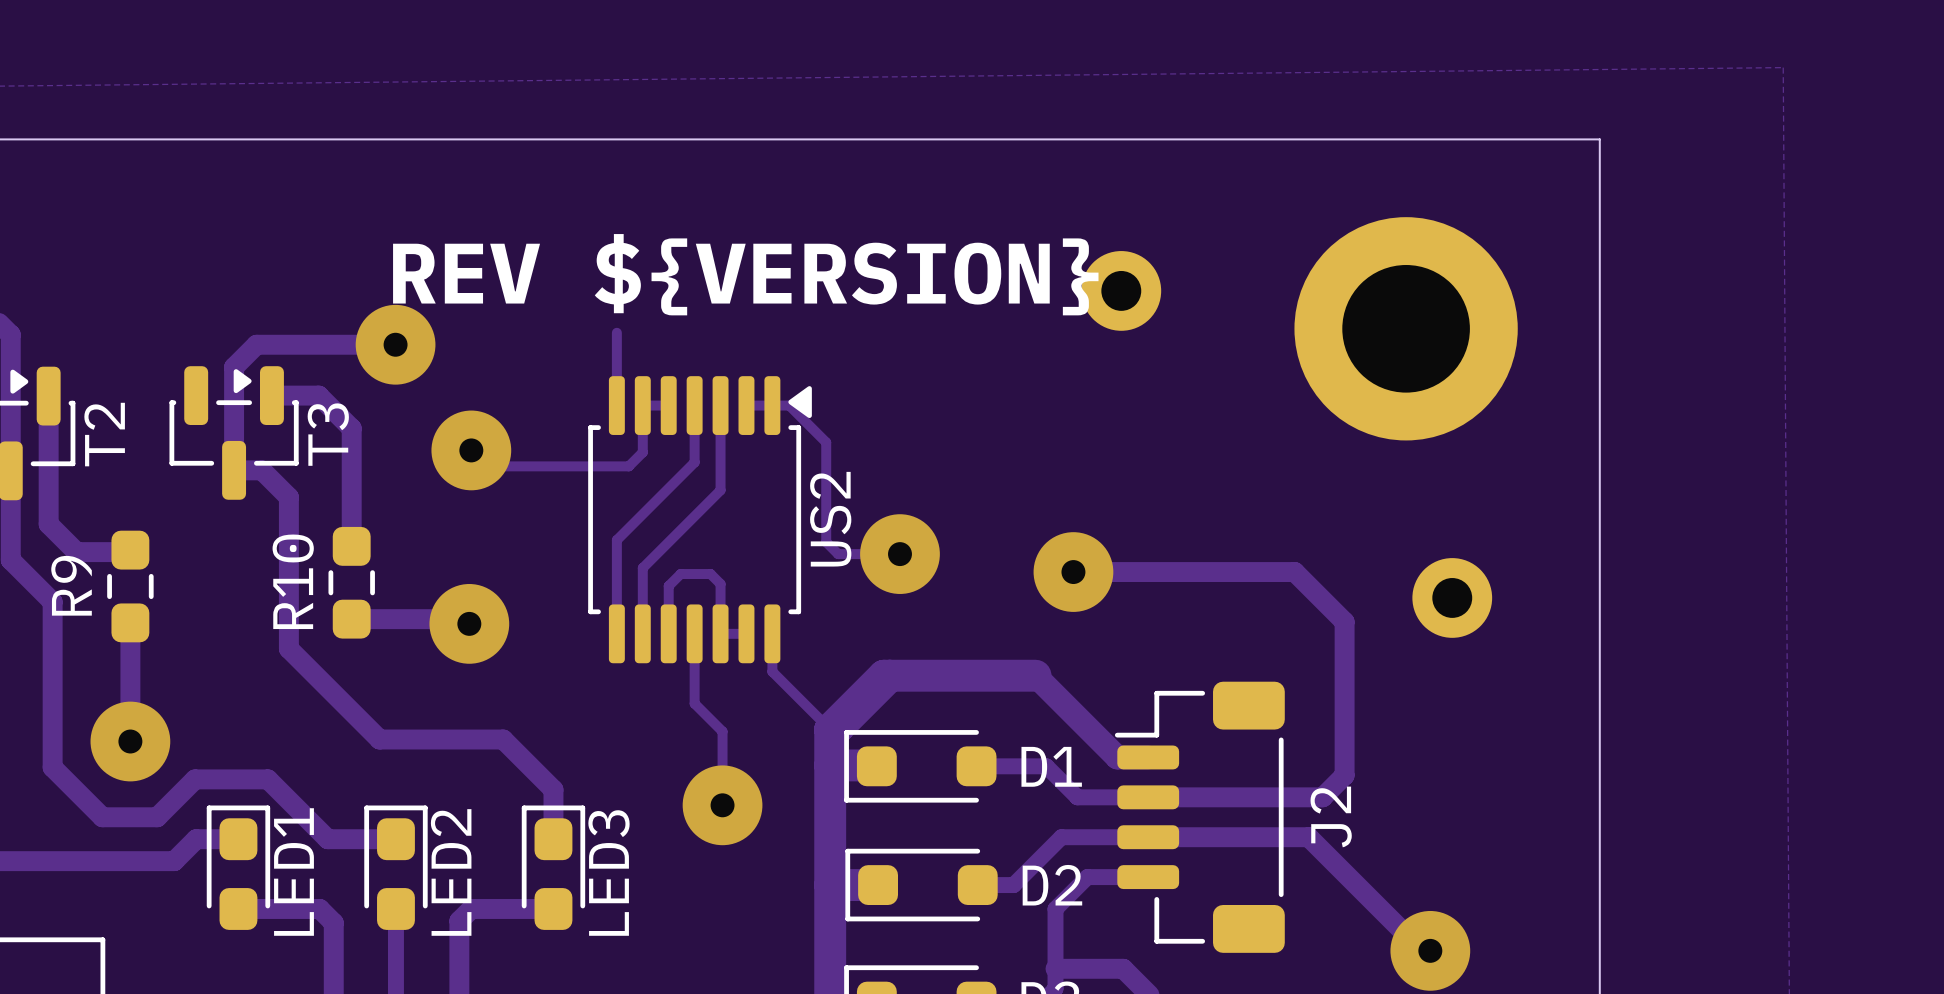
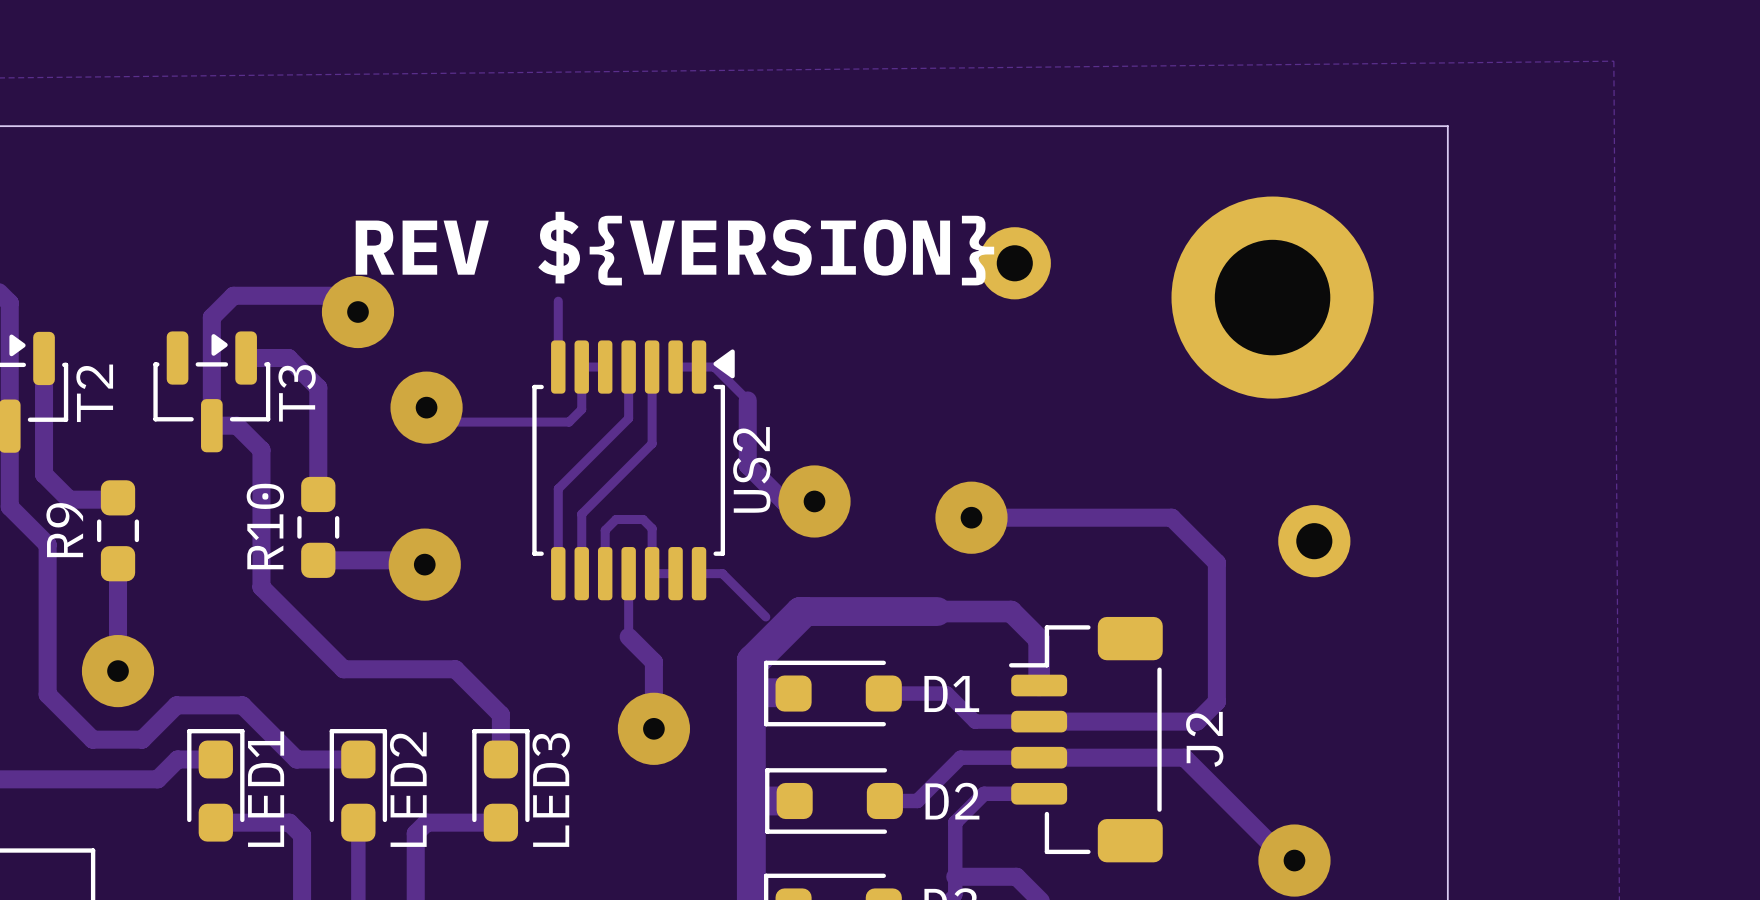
track: (395, 344) (256, 344) (234, 367) -> (357, 312) (341, 295) (233, 295) (211, 317) (211, 332)
track width: thin (826, 442) (826, 514) -> thick (747, 400) (747, 465)
track: (826, 514) (826, 542) (838, 554) (866, 554) -> (747, 465) (783, 501)
track: (772, 633) (772, 671) (830, 729) -> (699, 573) (722, 573) (765, 616)
track: (1035, 675) (1117, 757) (1148, 757) -> (937, 611) (1011, 611) (1039, 639) (1039, 685)
track width: thin (694, 703) (722, 731) (722, 805) -> thick (628, 636) (653, 662) (653, 728)

